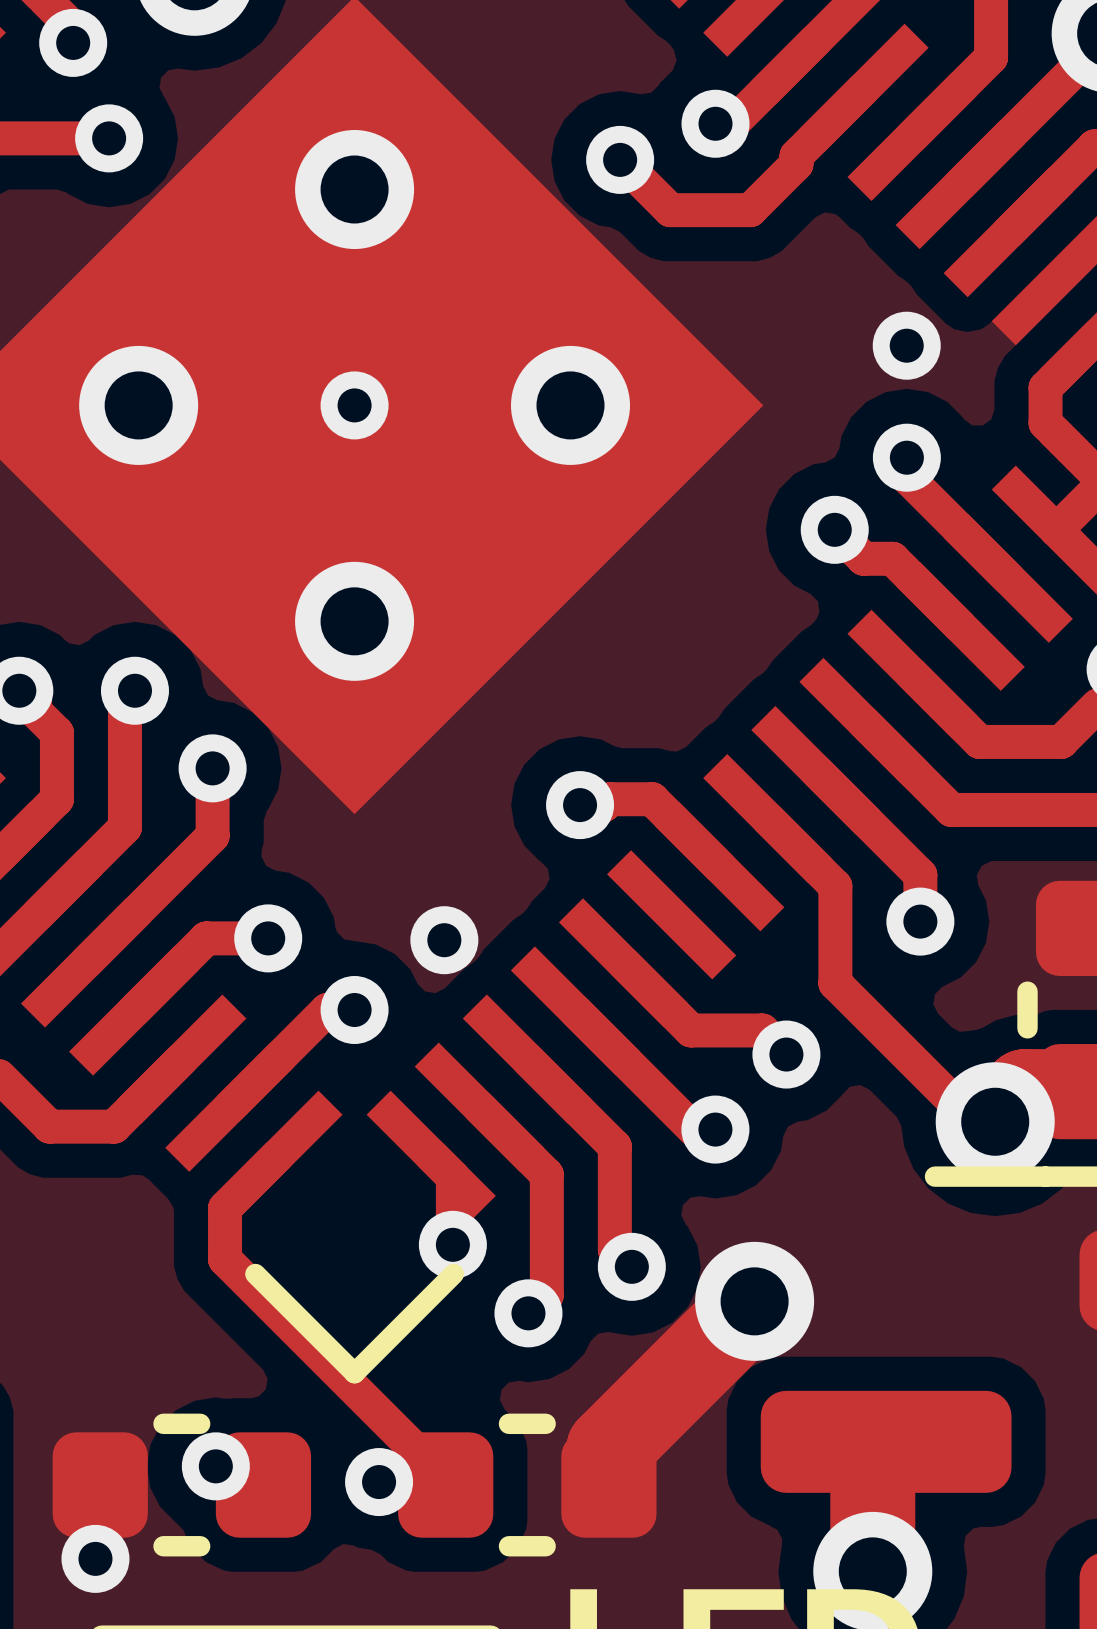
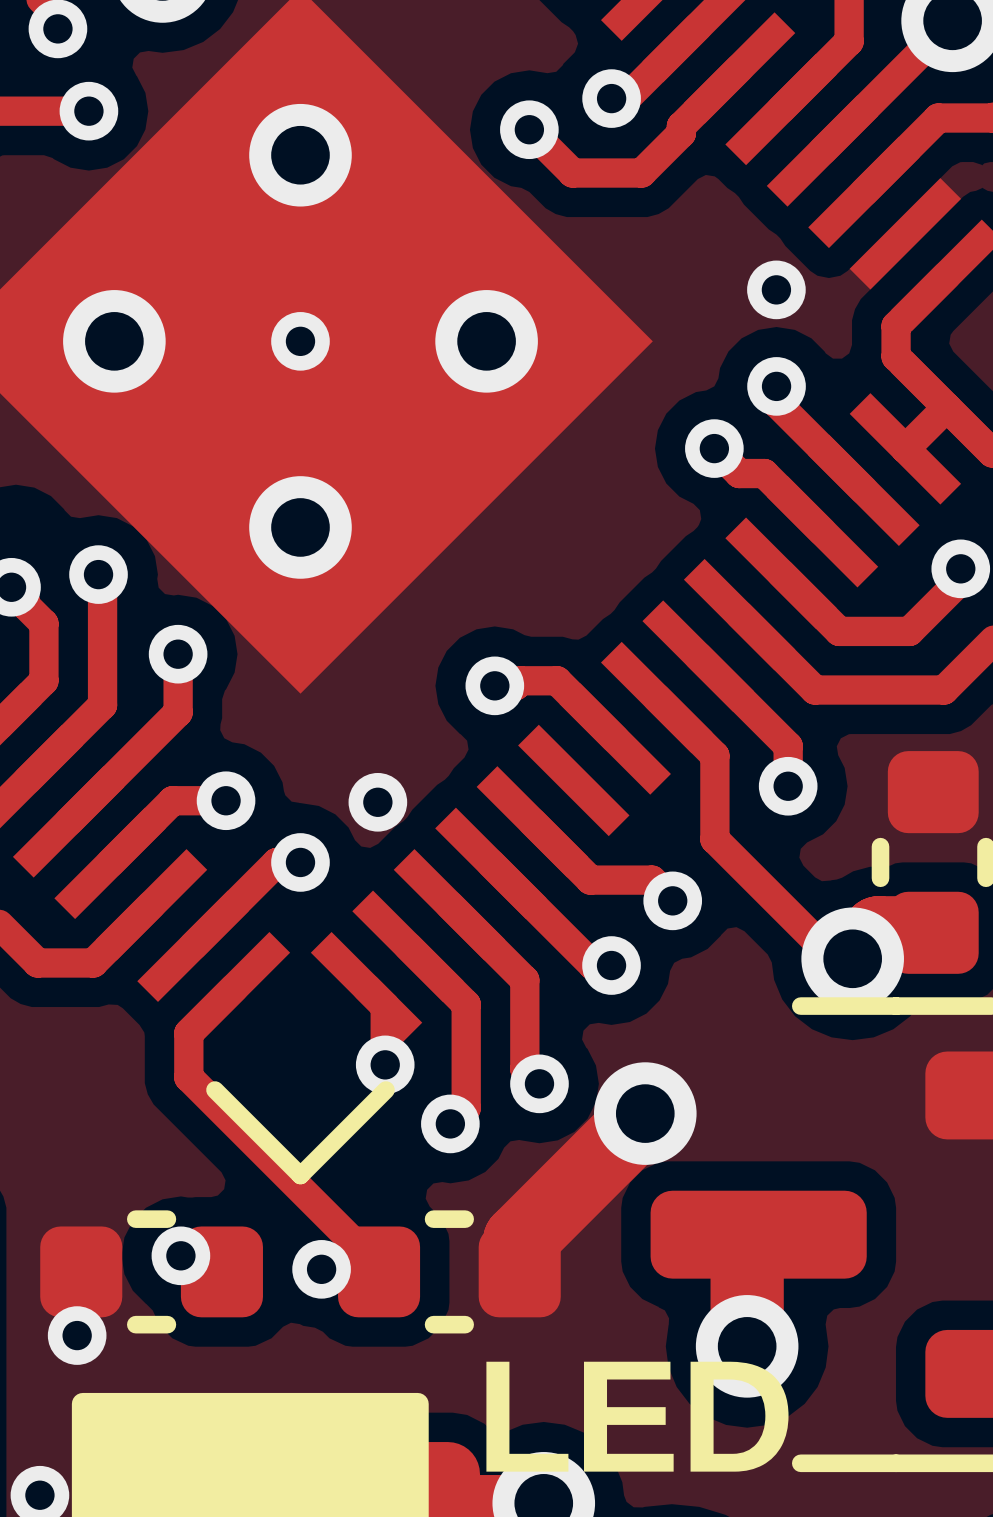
via position: (134, 690) -> (98, 574)

